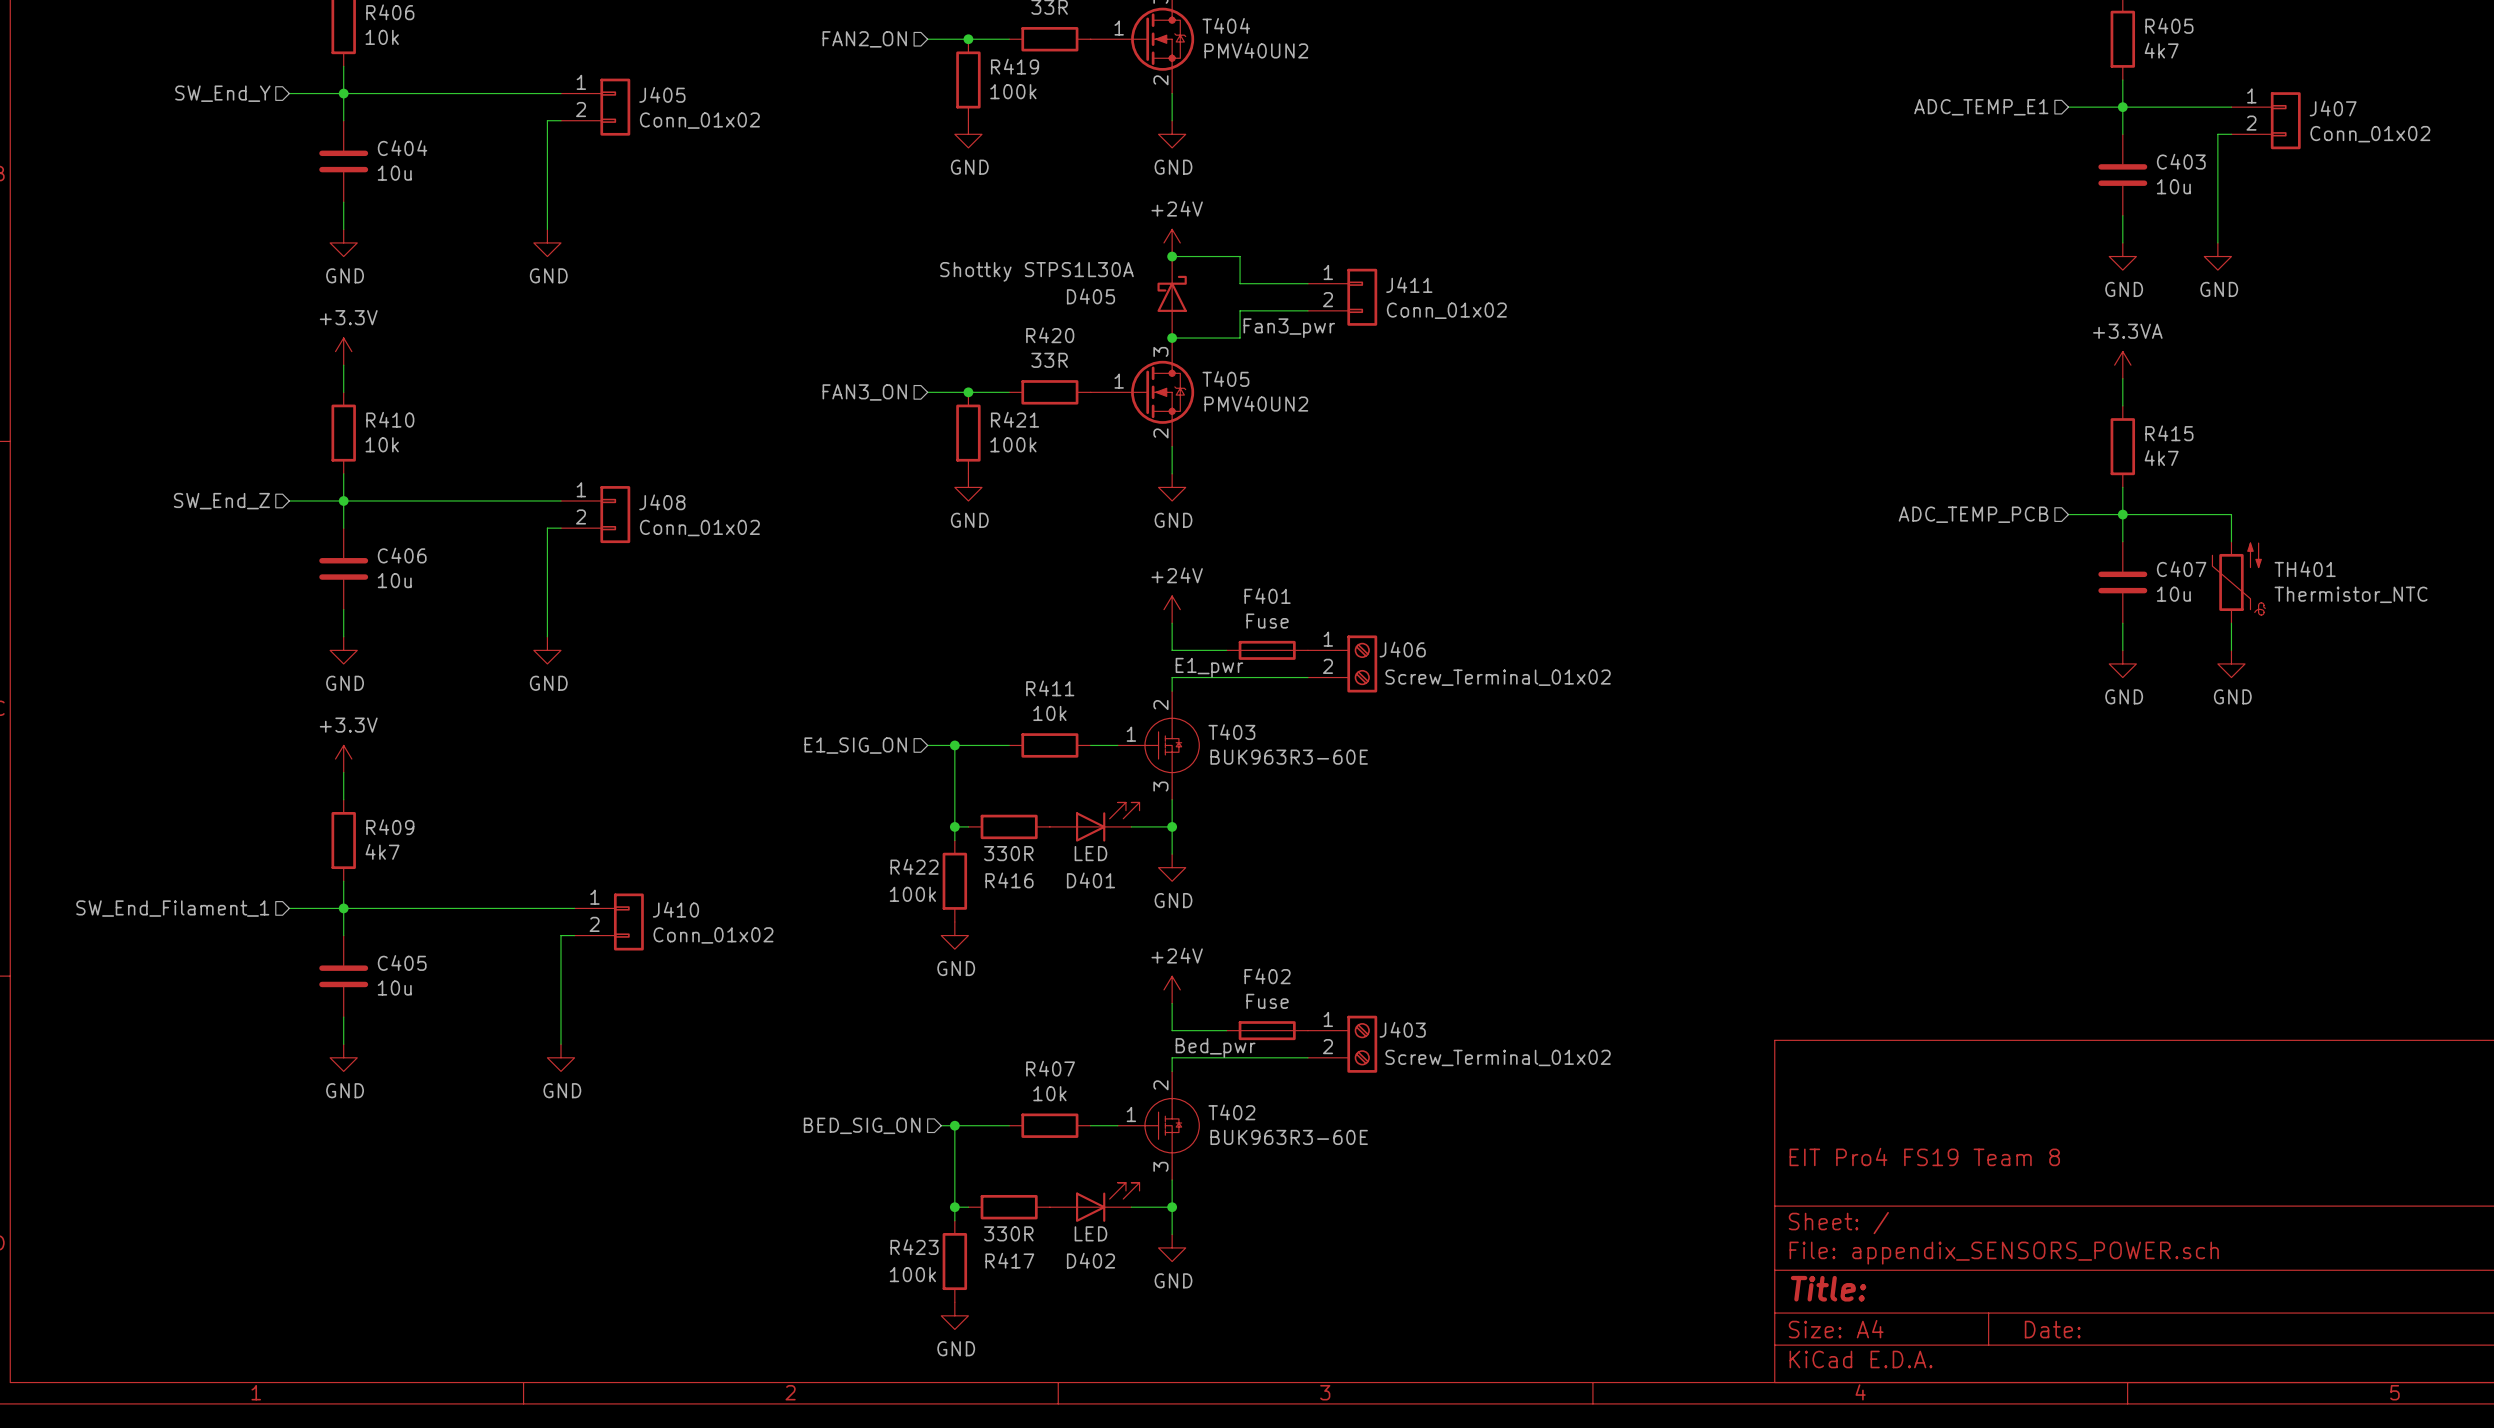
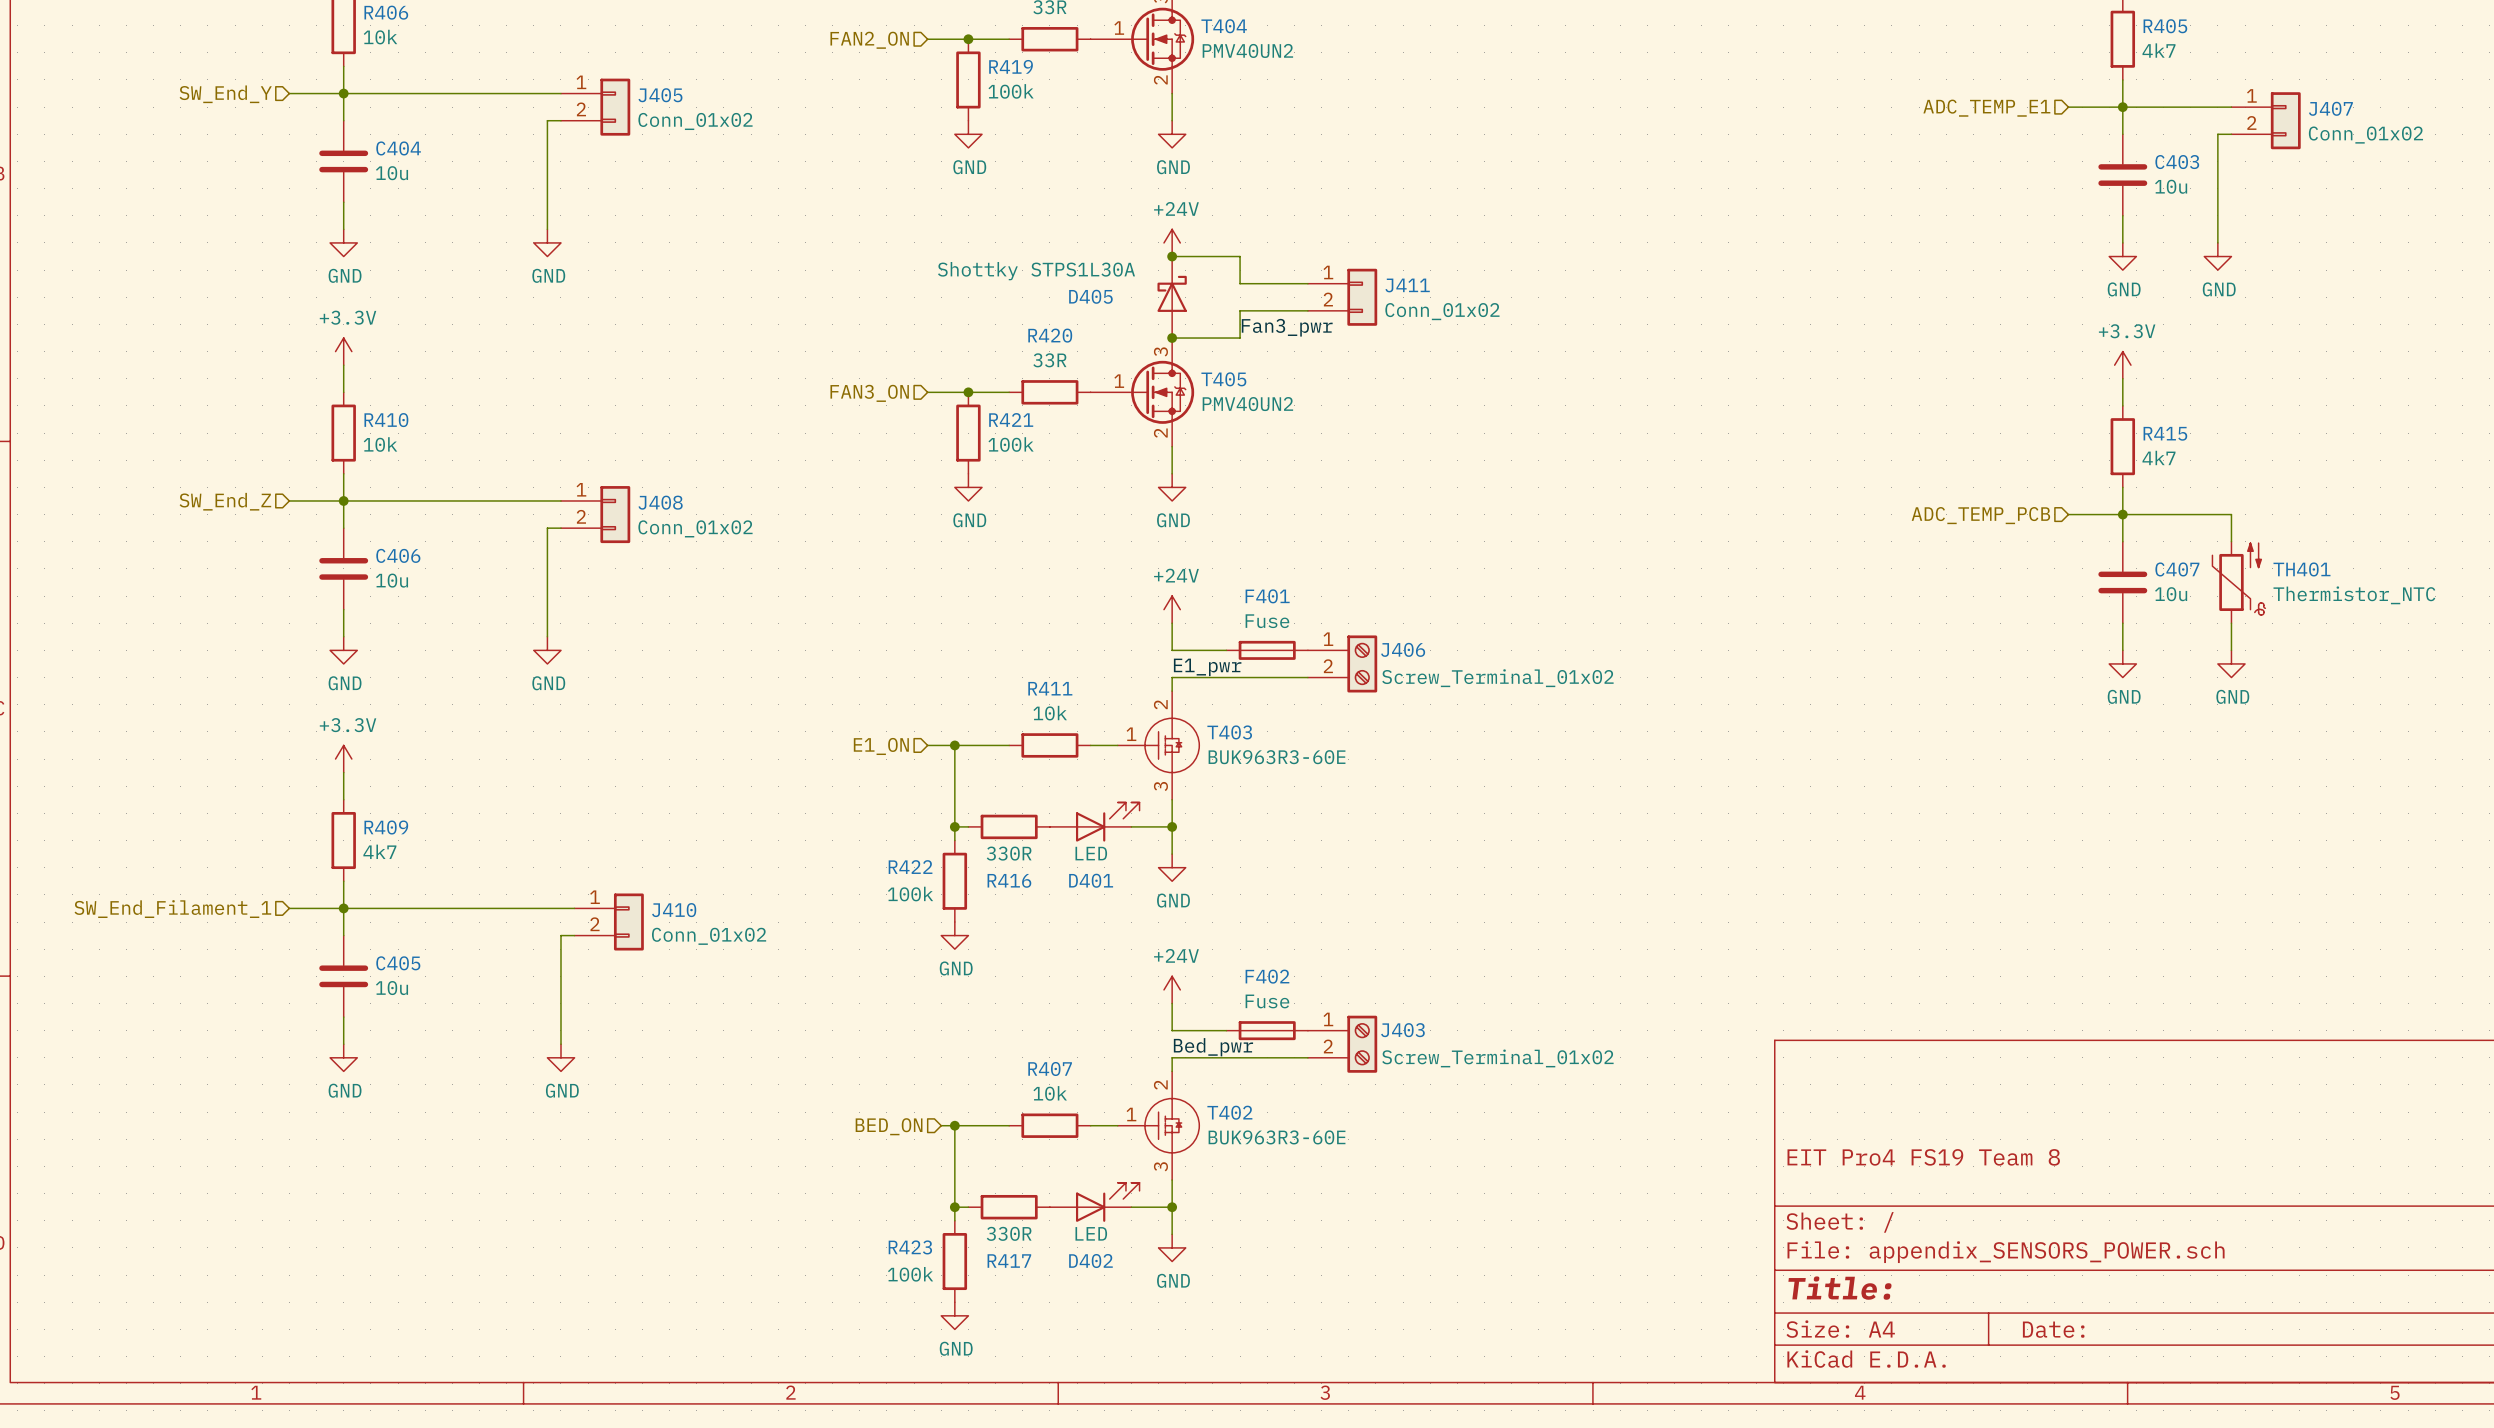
power symbol: +3.3VA (2122, 365) -> +3.3V (2122, 365)
hierarchical label: E1_SIG_ON (855, 745) -> E1_ON (881, 746)
hierarchical label: BED_SIG_ON (862, 1125) -> BED_ON (889, 1126)

